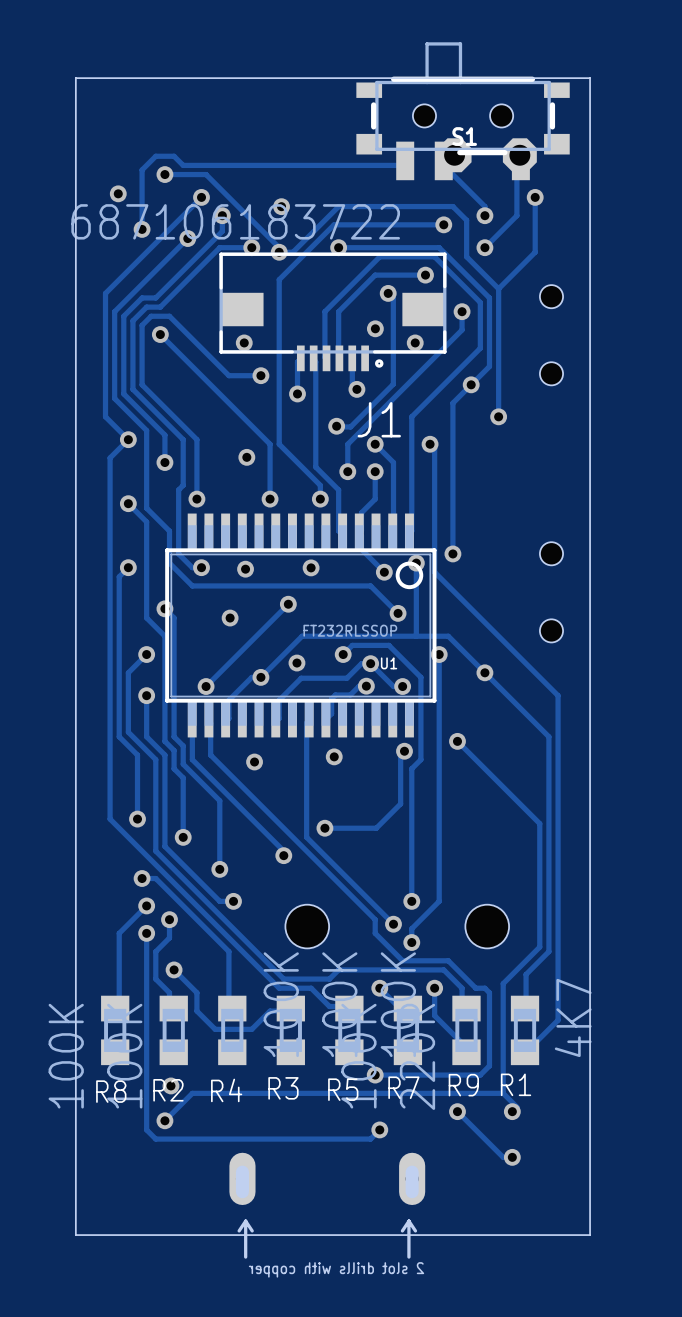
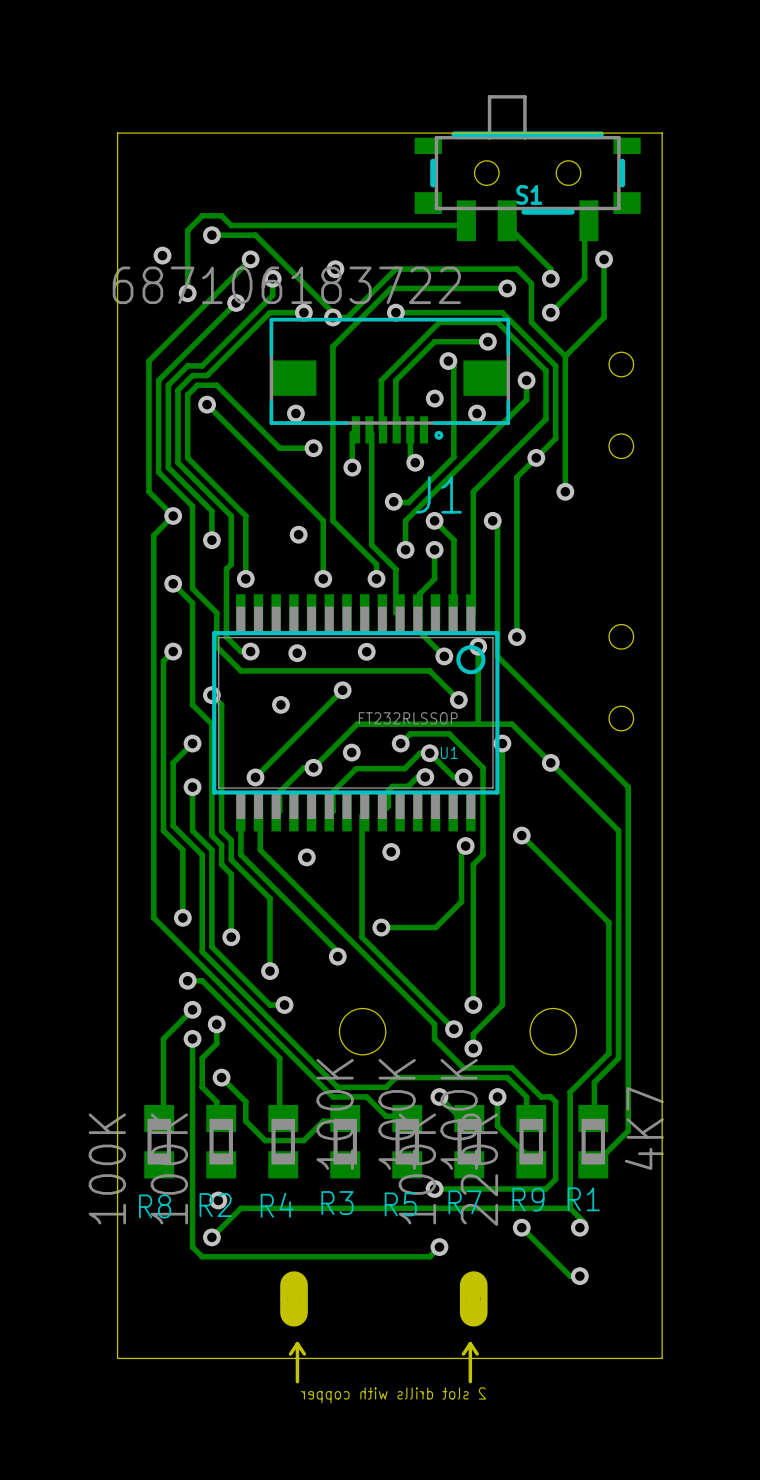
part: (487, 155) -> none

